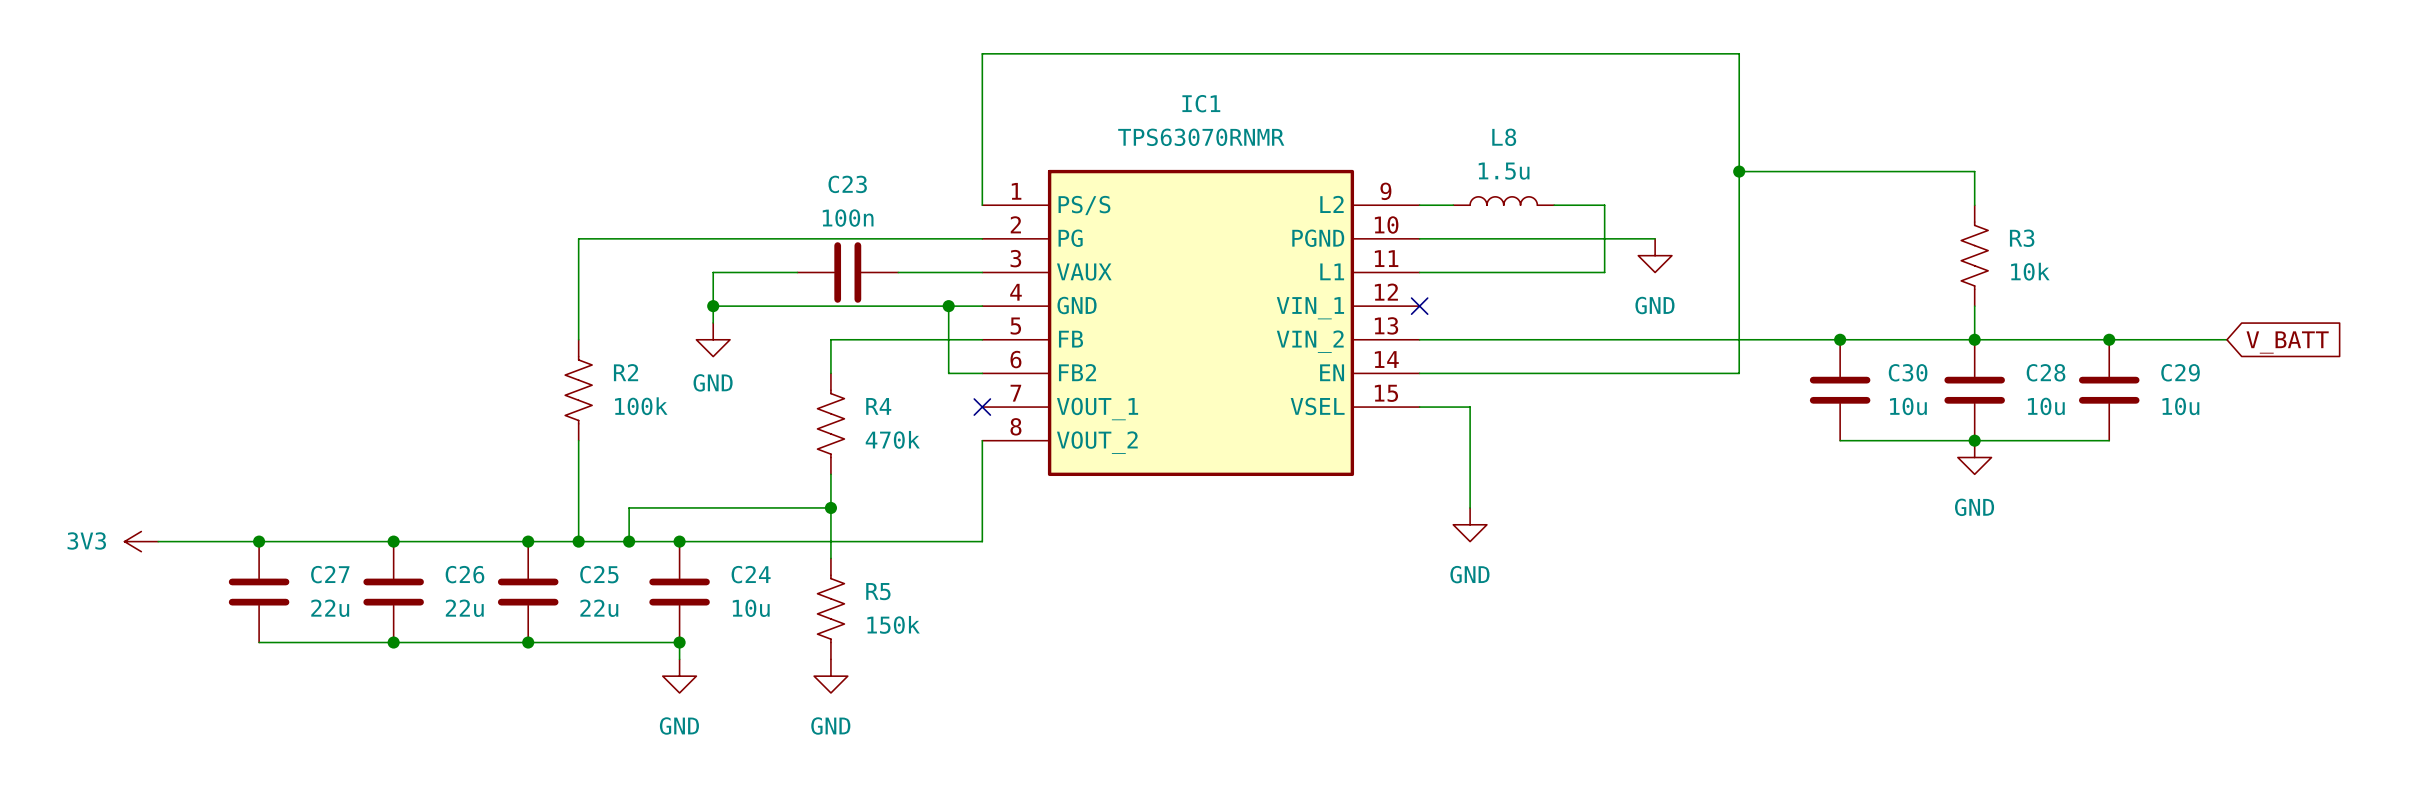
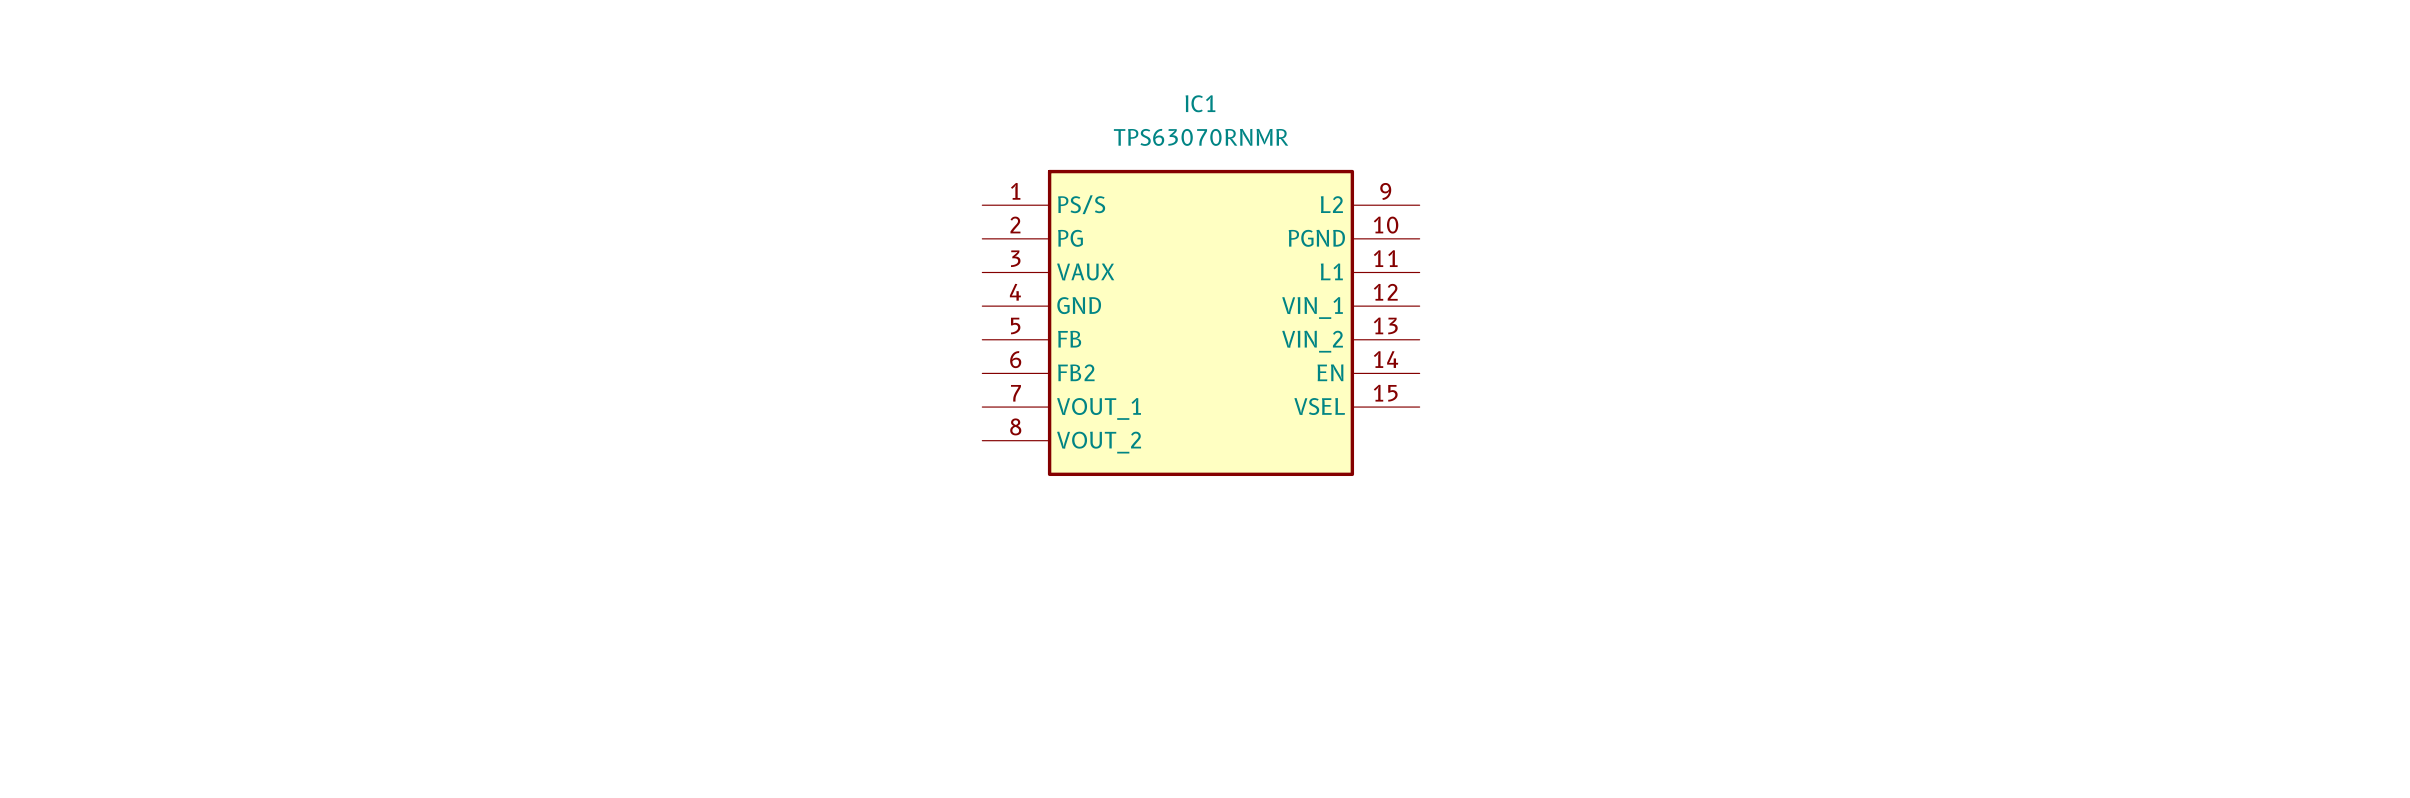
wire: (1739, 171) (1974, 171) (1974, 205) -> none
junction: (1739, 171) -> none
L8: 1.5u (1503, 201) -> none
wire: (982, 205) (982, 53) (1739, 53) (1739, 373) (1419, 373) -> none
wire: (1419, 205) (1453, 205) -> none
wire: (1554, 205) (1604, 205) (1604, 272) (1419, 272) -> none
wire: (982, 238) (578, 238) (578, 339) -> none
wire: (1419, 238) (1655, 238) -> none
power symbol: GND (1655, 255) -> none
R3: 10k (1974, 255) -> none
wire: (797, 272) (713, 272) (713, 322) -> none
C23: 100n (847, 272) -> none
wire: (898, 272) (982, 272) -> none
wire: (713, 306) (982, 306) -> none
junction: (713, 306) -> none
wire: (948, 306) (948, 373) (982, 373) -> none
junction: (948, 306) -> none
no-connect mark: (1419, 306) -> none
wire: (1974, 306) (1974, 339) -> none
power symbol: GND (713, 339) -> none
wire: (982, 339) (830, 339) (830, 373) -> none
wire: (1419, 339) (2226, 339) -> none
junction: (1840, 339) -> none
junction: (1974, 339) -> none
junction: (2109, 339) -> none
global label: V_BATT (2287, 342) -> none
R2: 100k (578, 390) -> none
C30: 10u (1840, 390) -> none
C28: 10u (1974, 390) -> none
C29: 10u (2109, 390) -> none
no-connect mark: (982, 407) -> none
wire: (1419, 407) (1470, 407) (1470, 507) -> none
R4: 470k (830, 423) -> none
wire: (578, 440) (578, 541) -> none
wire: (982, 440) (982, 541) (158, 541) -> none
wire: (1840, 440) (2109, 440) -> none
junction: (1974, 440) -> none
power symbol: GND (1974, 457) -> none
wire: (830, 474) (830, 558) -> none
wire: (830, 507) (629, 507) (629, 541) -> none
junction: (830, 507) -> none
power symbol: GND (1470, 524) -> none
power symbol: 3V3 (141, 541) -> none
junction: (259, 541) -> none
junction: (393, 541) -> none
junction: (528, 541) -> none
junction: (578, 541) -> none
junction: (629, 541) -> none
junction: (679, 541) -> none
C27: 22u (259, 592) -> none
C26: 22u (393, 592) -> none
C25: 22u (528, 592) -> none
C24: 10u (679, 592) -> none
R5: 150k (830, 608) -> none
wire: (259, 642) (679, 642) (679, 659) -> none
junction: (393, 642) -> none
junction: (528, 642) -> none
junction: (679, 642) -> none
power symbol: GND (679, 676) -> none
power symbol: GND (830, 676) -> none

